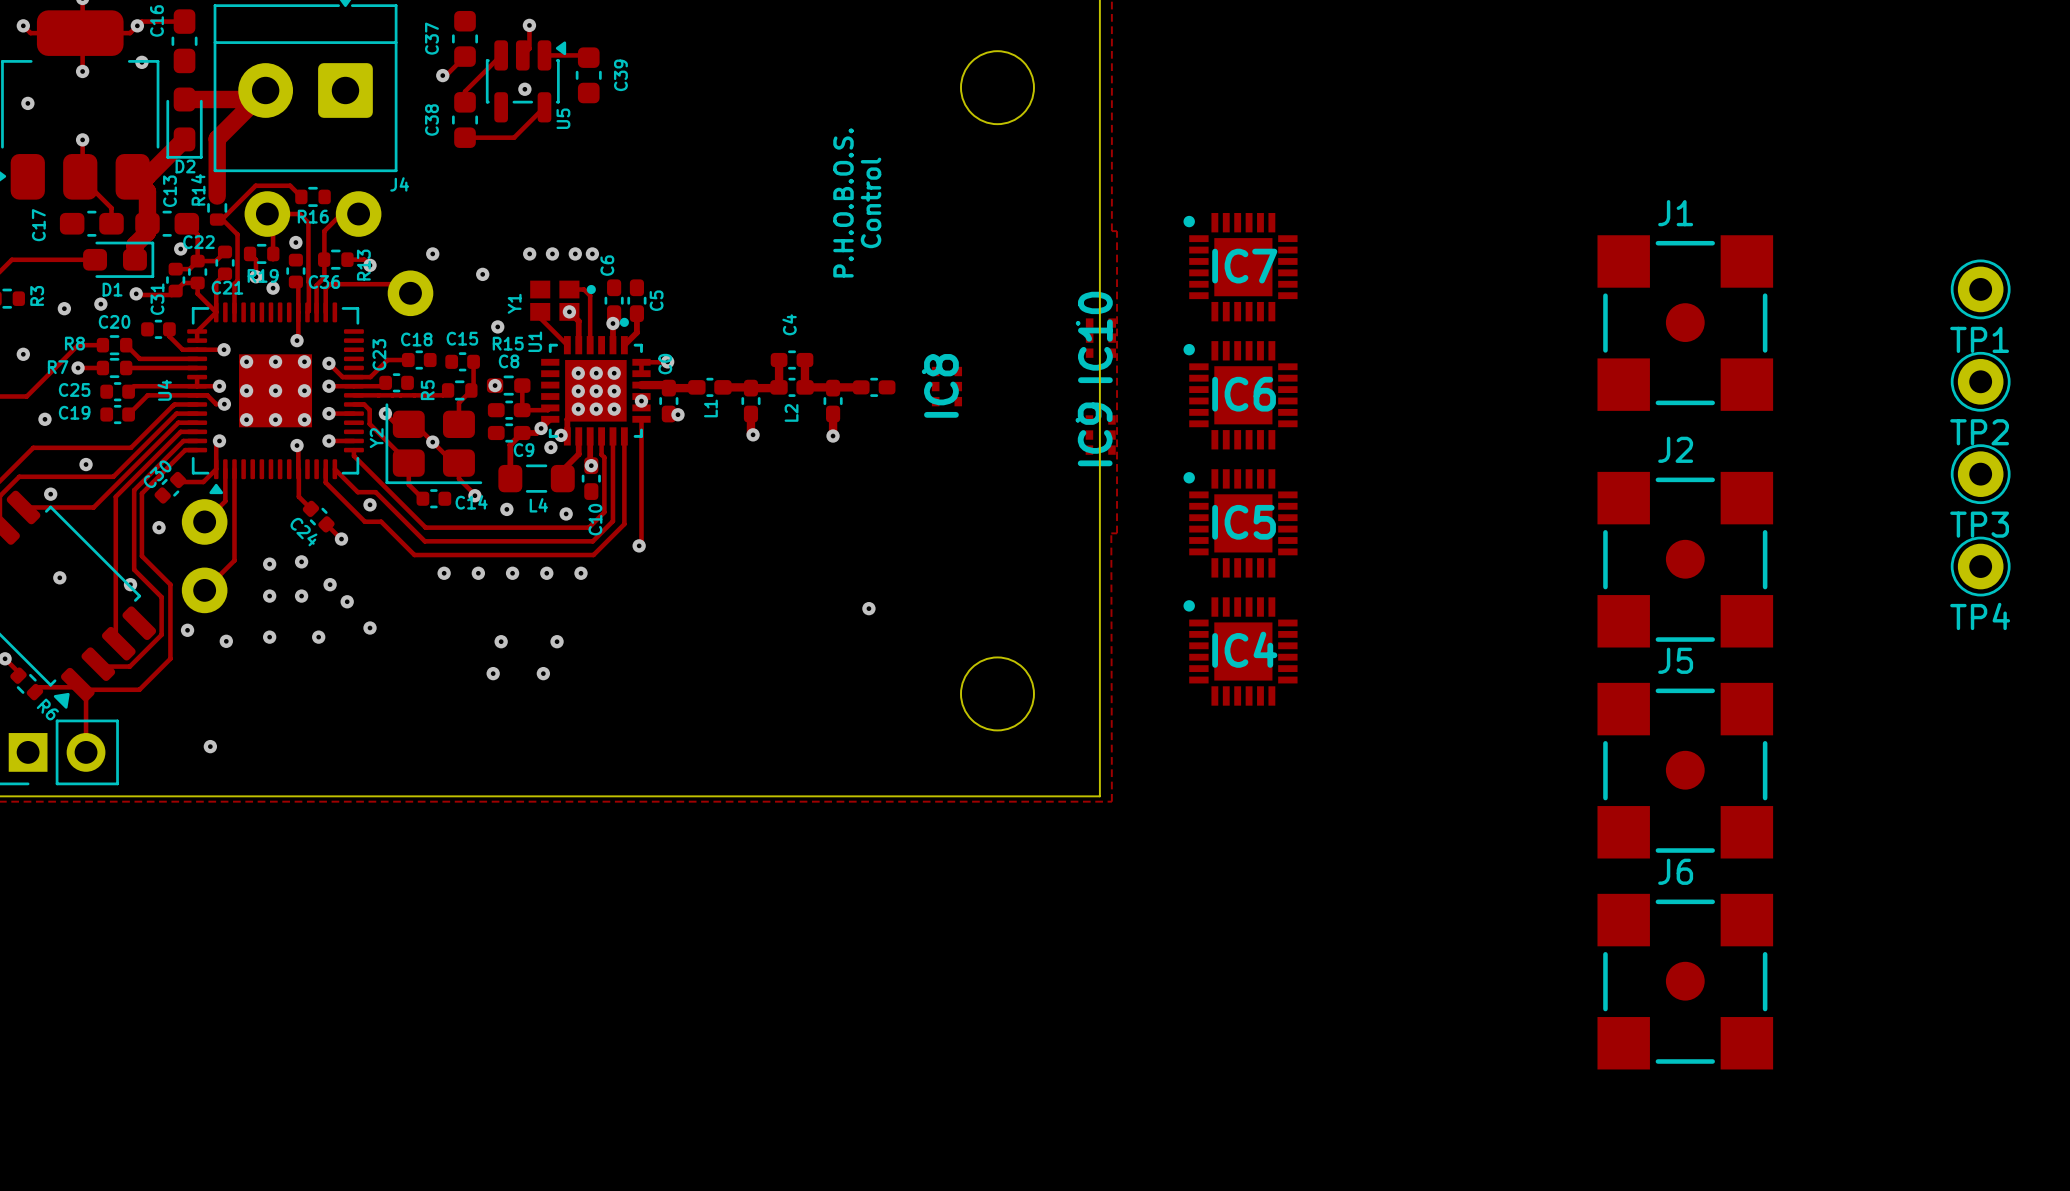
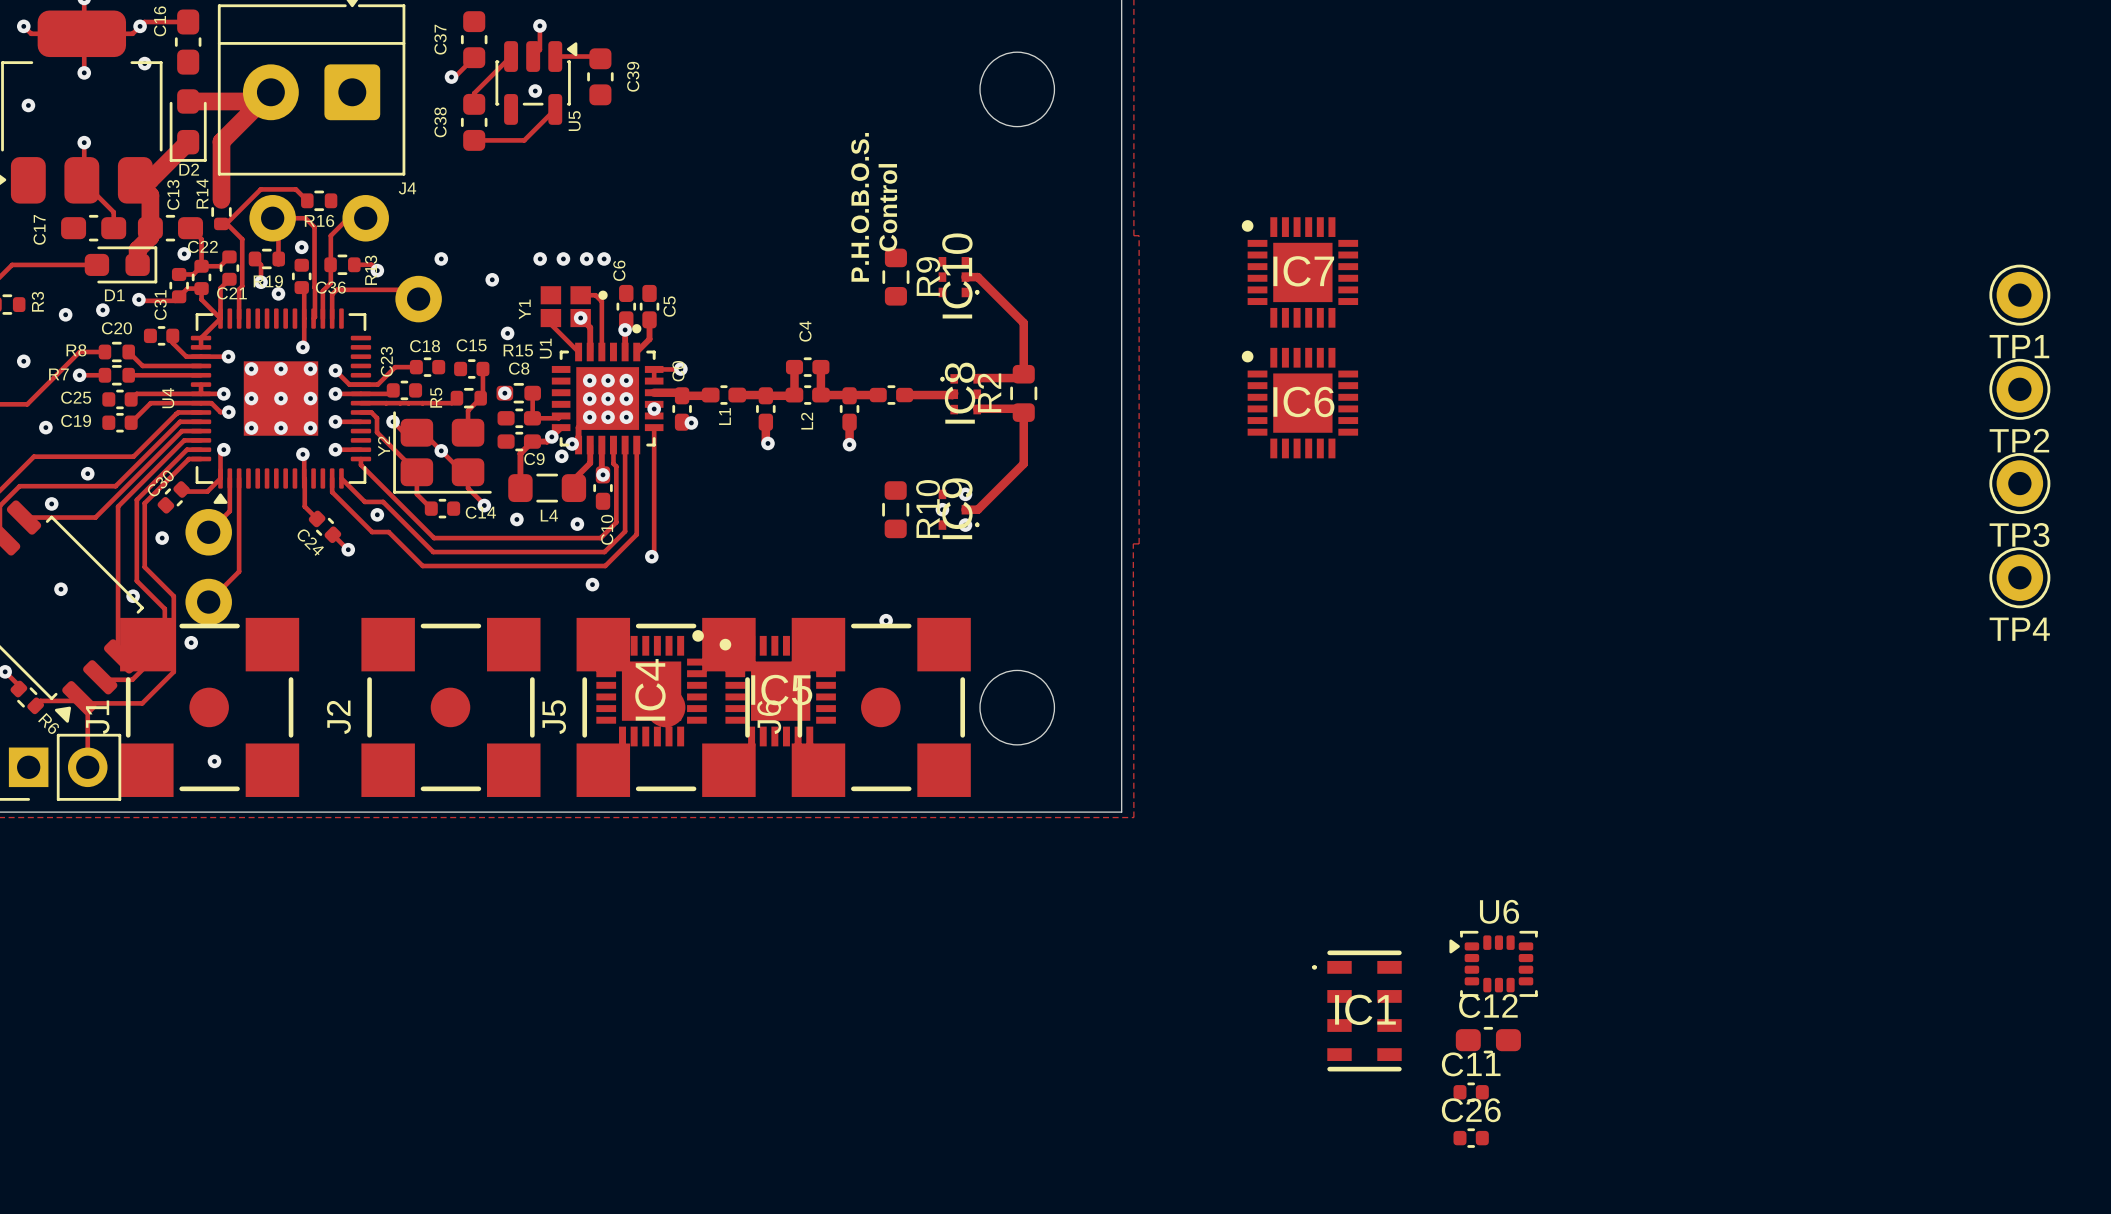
IC7 position: (1240, 267) -> (1299, 272)
R9: none -> (895, 277)
track: none -> (965, 277) (977, 277) (1023, 323) (1023, 374) (1019, 378) (977, 378)
J1 rotation: 0° (1685, 323) -> 90° counterclockwise (209, 707)
J1 position: (1685, 323) -> (209, 707)
IC10 rotation: 0° (1095, 338) -> 180° (959, 277)
IC10 position: (1095, 338) -> (959, 277)
track: none -> (954, 393) (952, 395) (904, 395)
R2: none -> (1023, 393)
IC6 position: (1240, 395) -> (1299, 403)
track: none -> (977, 408) (1019, 408) (1023, 412) (1023, 463) (977, 509) (965, 509)
IC9 rotation: 0° (1095, 435) -> 180° (959, 509)
IC9 position: (1095, 435) -> (959, 509)
via: none -> (965, 494)
R10: none -> (895, 509)
via: none -> (942, 509)
via: none -> (965, 525)
IC5 position: (1240, 523) -> (777, 691)
J2 rotation: 0° (1685, 559) -> 90° counterclockwise (450, 707)
J2 position: (1685, 559) -> (450, 707)
via: (301, 561) -> none
via: (269, 564) -> none
via: (444, 573) -> none
via: (478, 573) -> none
via: (512, 573) -> none
via: (546, 573) -> none
via: (330, 584) -> none
via: (269, 596) -> none
via: (301, 596) -> none
via: (347, 601) -> none
via: (370, 628) -> none
via: (269, 637) -> none
via: (318, 637) -> none
via: (226, 641) -> none
via: (501, 641) -> none
via: (557, 641) -> none
IC4 rotation: 0° (1240, 651) -> 90° clockwise (651, 688)
IC4 position: (1240, 651) -> (651, 688)
via: (493, 673) -> none
via: (543, 673) -> none
J5 rotation: 0° (1685, 770) -> 90° counterclockwise (666, 707)
J5 position: (1685, 770) -> (666, 707)
U6: none -> (1493, 963)
J6 rotation: 0° (1685, 981) -> 90° counterclockwise (881, 707)
J6 position: (1685, 981) -> (881, 707)
IC1: none -> (1356, 1010)
C12: none -> (1488, 1040)
C11: none -> (1471, 1092)
C26: none -> (1471, 1138)

